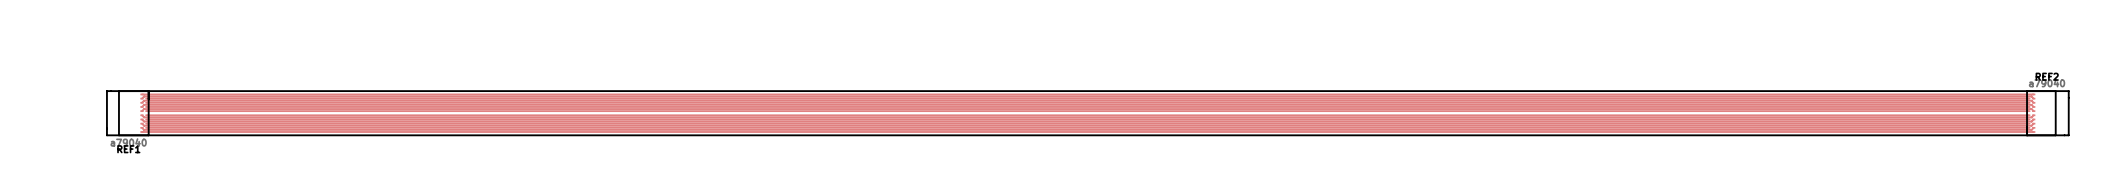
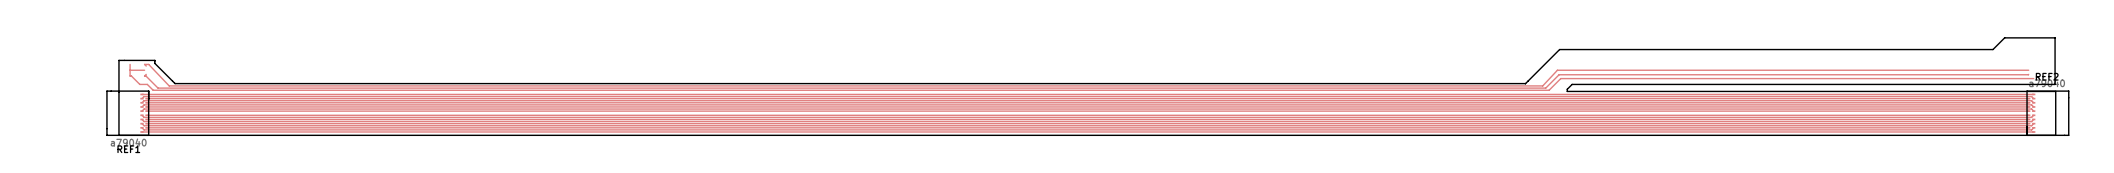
track: none -> (130, 64) (130, 76) (139, 84) (147, 84) (153, 90) (1549, 90) (1560, 78) (2033, 78)
track: none -> (146, 66) (144, 64) (148, 64) (169, 85) (1542, 85) (1557, 70) (2028, 70)
track: none -> (130, 70) (144, 70)
track: none -> (146, 74) (144, 76) (158, 88) (1545, 88) (1559, 74) (2028, 74)
board edge: (118, 91) (2055, 91) -> (118, 91) (118, 60) (154, 60) (154, 63) (175, 83) (1525, 83) (1559, 49) (1992, 49) (2004, 37) (2055, 37) (2055, 84) (1572, 84) (1567, 91) (2055, 91)

